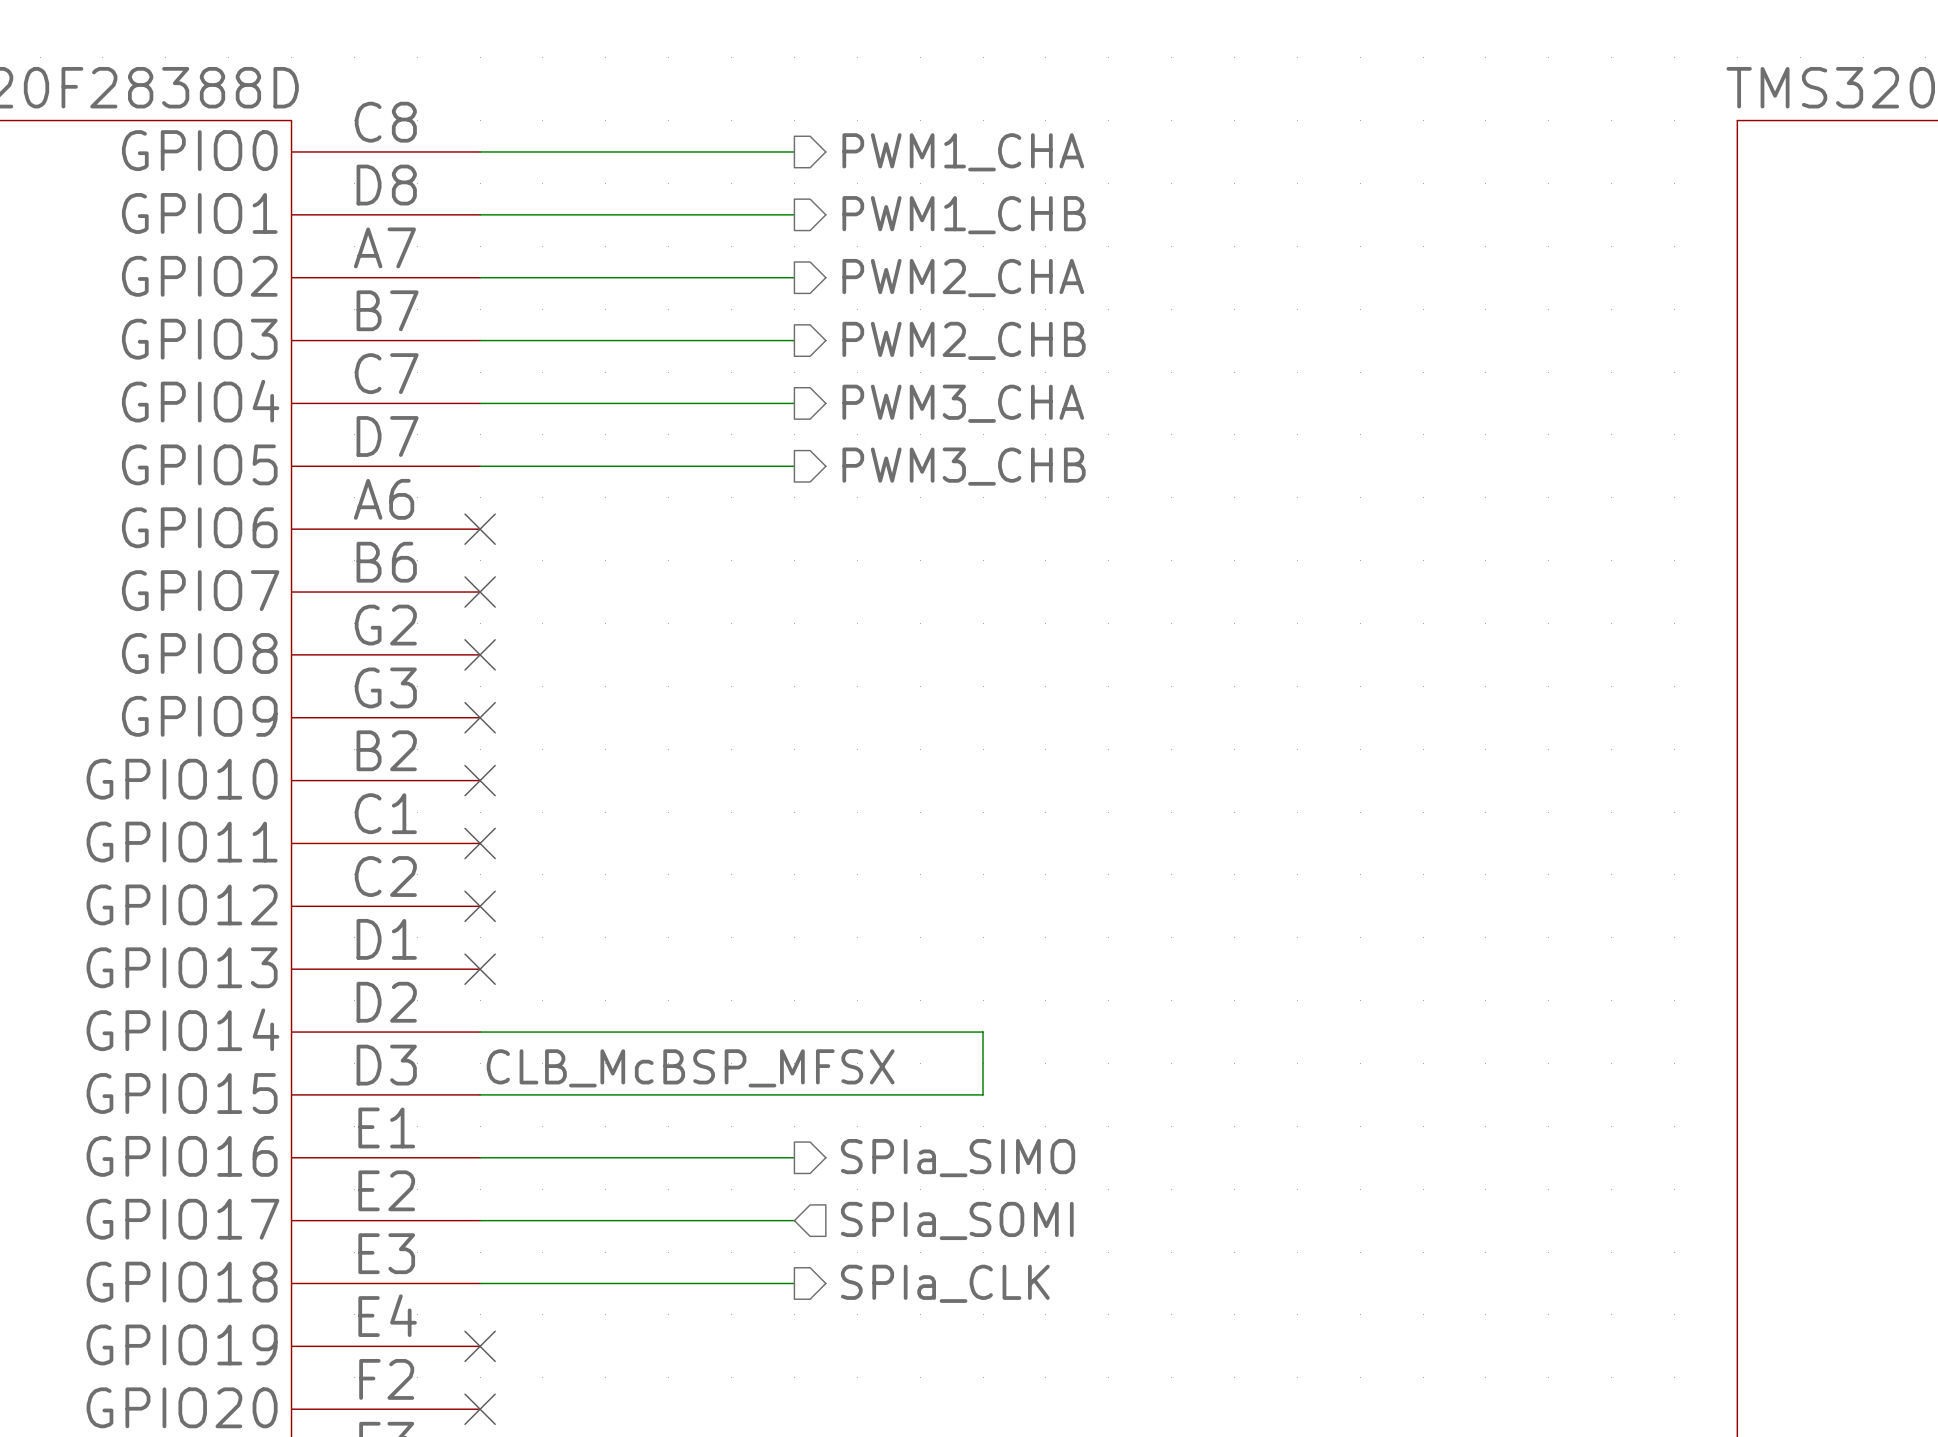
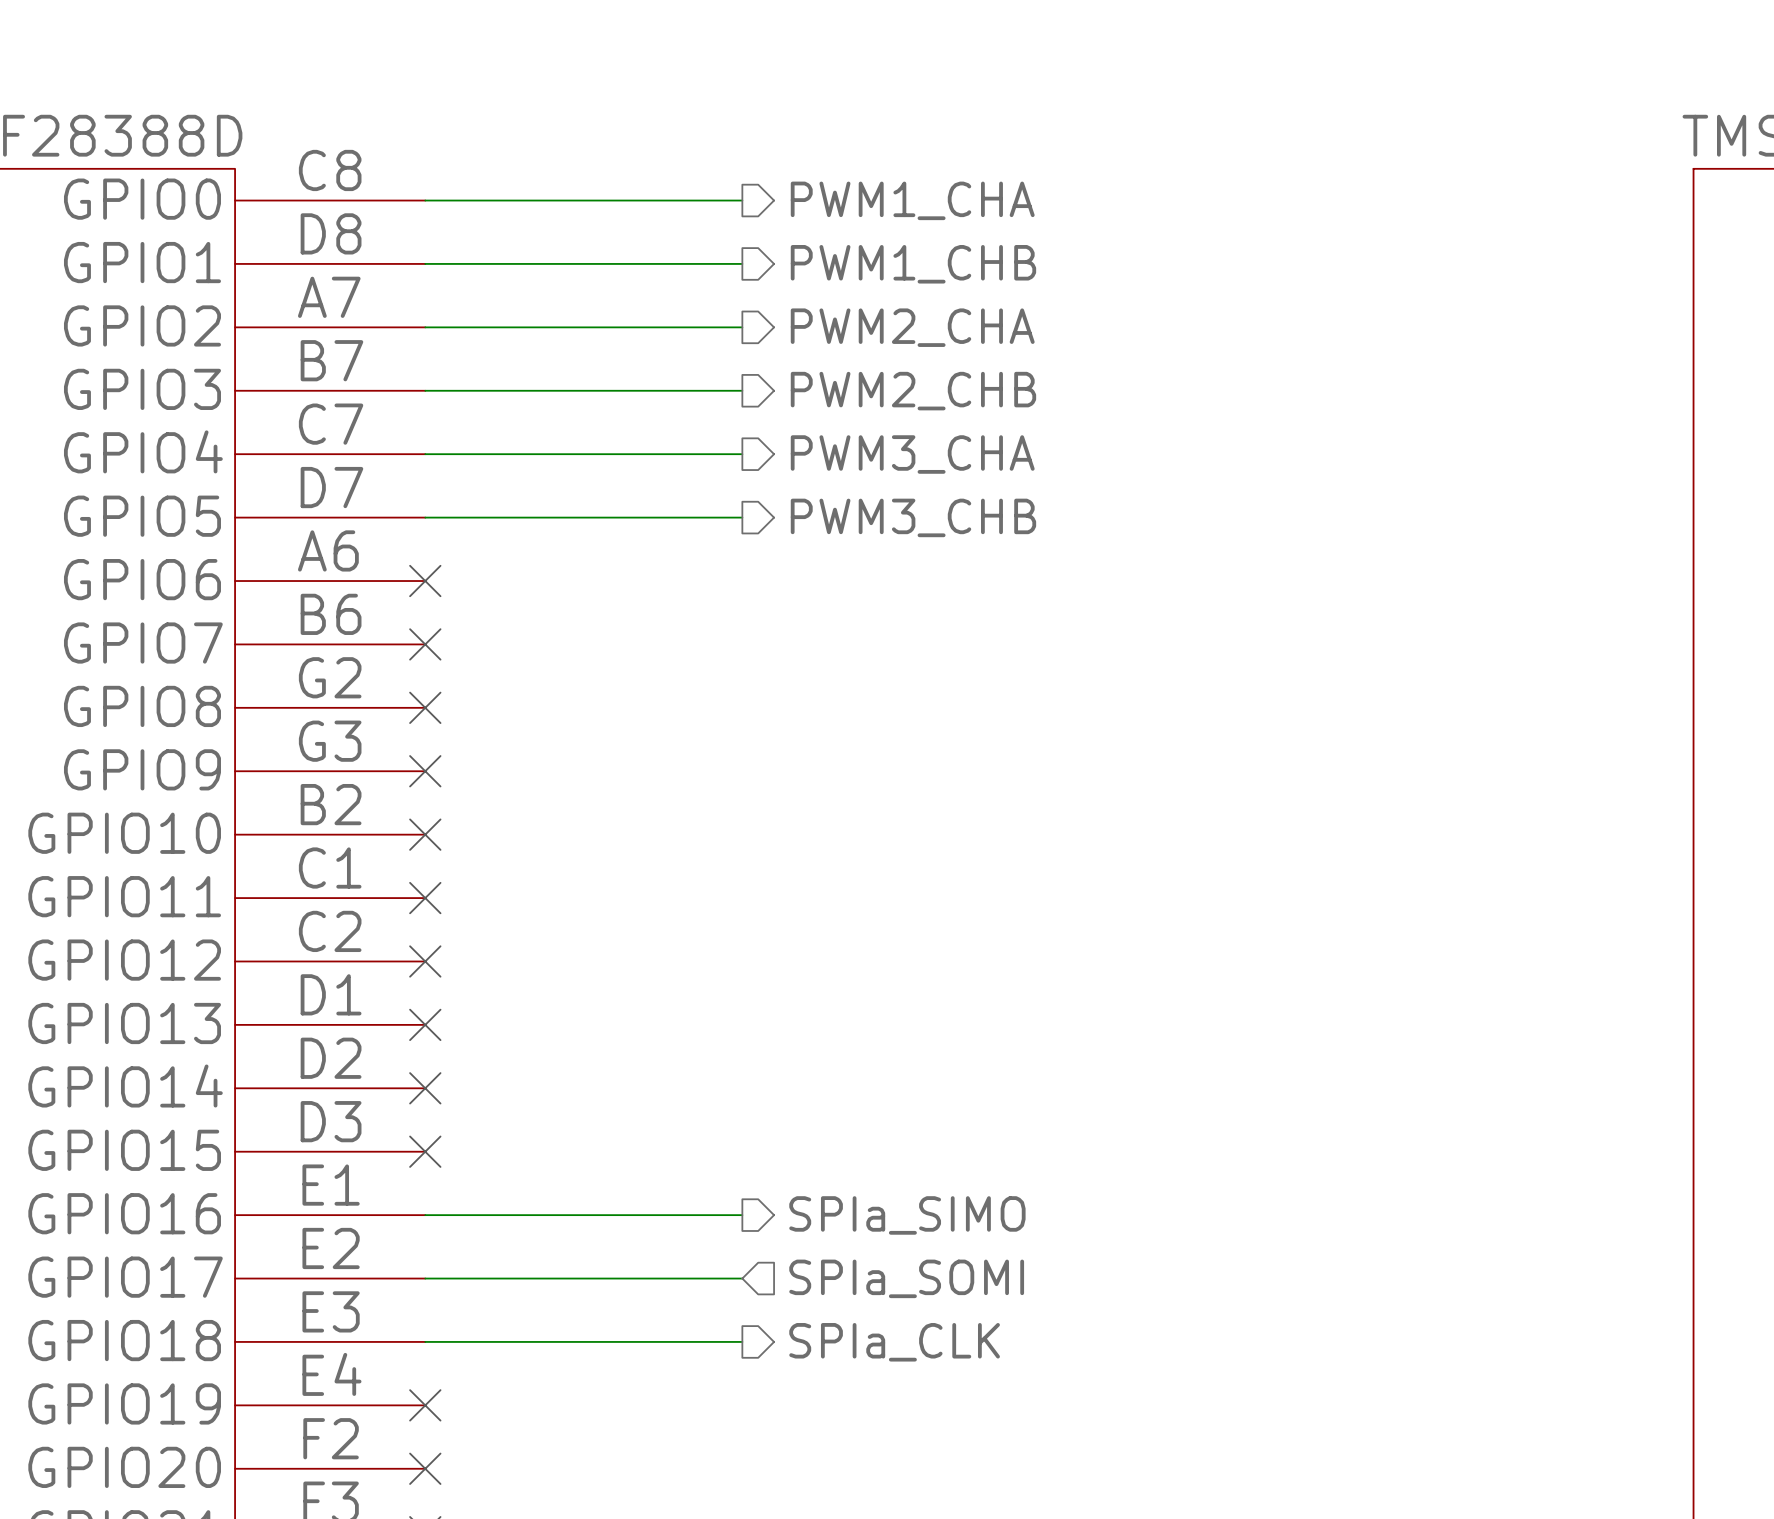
wire: (480, 1032) (983, 1032) (983, 1094) (480, 1094) -> none
no-connect mark: none -> (425, 1088)
label: CLB_McBSP_MFSX (690, 1068) -> none
no-connect mark: none -> (425, 1151)

